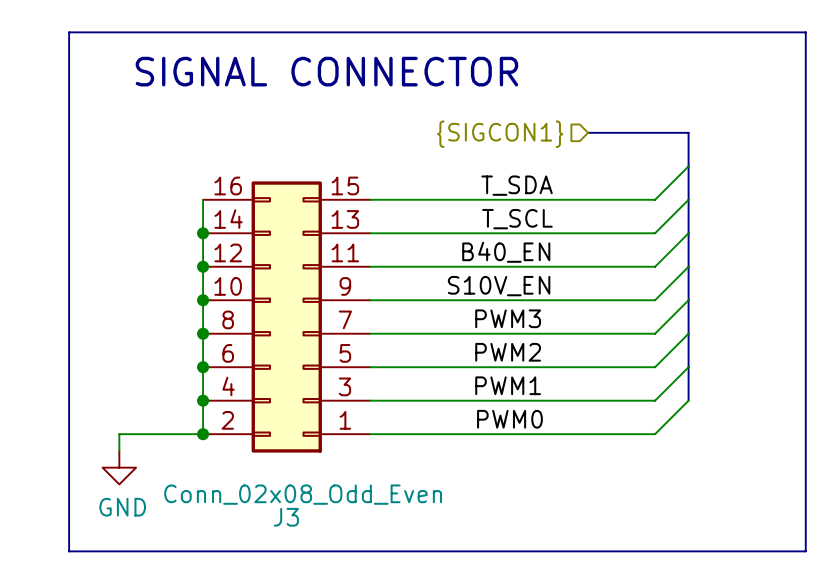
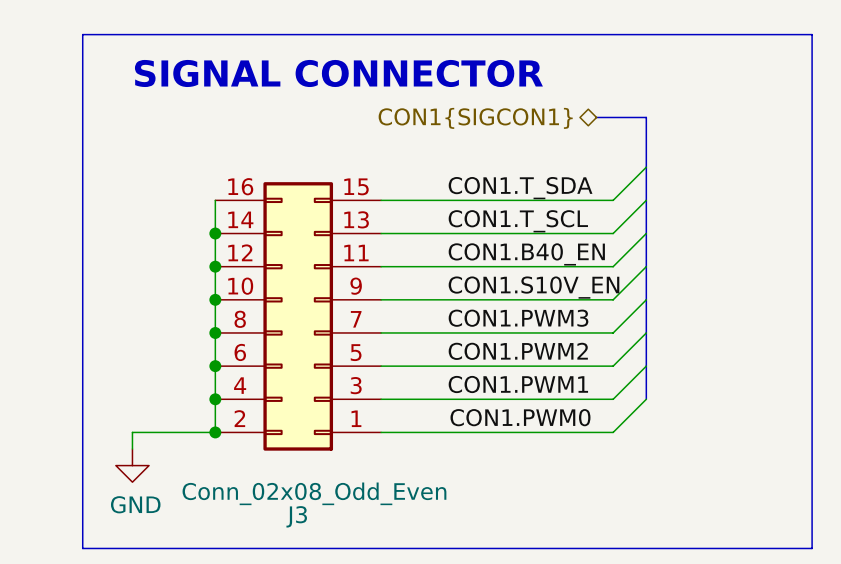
bus: none -> (596, 117) (646, 117) (646, 399)
bus: (588, 132) (688, 132) (688, 400) -> none
hierarchical label shape: input (500, 134) -> bidirectional (475, 118)
hierarchical label: {SIGCON1} (500, 134) -> CON1{SIGCON1} (475, 118)
wire: (688, 166) (655, 199) (604, 199) -> (646, 167) (613, 200)
label: T_SDA (517, 185) -> CON1.T_SDA (520, 188)
wire: (688, 199) (655, 233) (604, 233) -> (646, 200) (613, 233)
label: T_SCL (517, 219) -> CON1.T_SCL (518, 221)
wire: (688, 233) (655, 266) (604, 266) -> (646, 233) (613, 266)
label: B40_EN (506, 252) -> CON1.B40_EN (526, 254)
wire: (688, 266) (655, 300) (604, 300) -> (646, 266) (613, 299)
label: S10V_EN (499, 286) -> CON1.S10V_EN (533, 287)
wire: (688, 300) (655, 333) (604, 333) -> (646, 299) (613, 332)
label: PWM3 (508, 318) -> CON1.PWM3 (518, 318)
wire: (688, 333) (655, 367) (604, 367) -> (646, 332) (613, 366)
label: PWM2 (508, 352) -> CON1.PWM2 (518, 351)
wire: (688, 367) (655, 400) (604, 400) -> (646, 366) (613, 399)
label: PWM1 (508, 385) -> CON1.PWM1 (518, 384)
wire: (688, 400) (655, 434) (604, 434) -> (646, 399) (613, 432)
label: PWM0 (509, 419) -> CON1.PWM0 (520, 417)

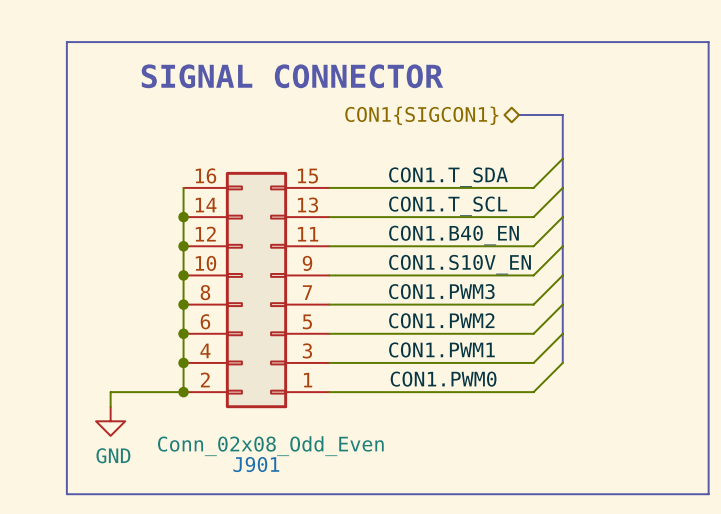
J3 name: J3 (296, 516) -> J901 (256, 464)

